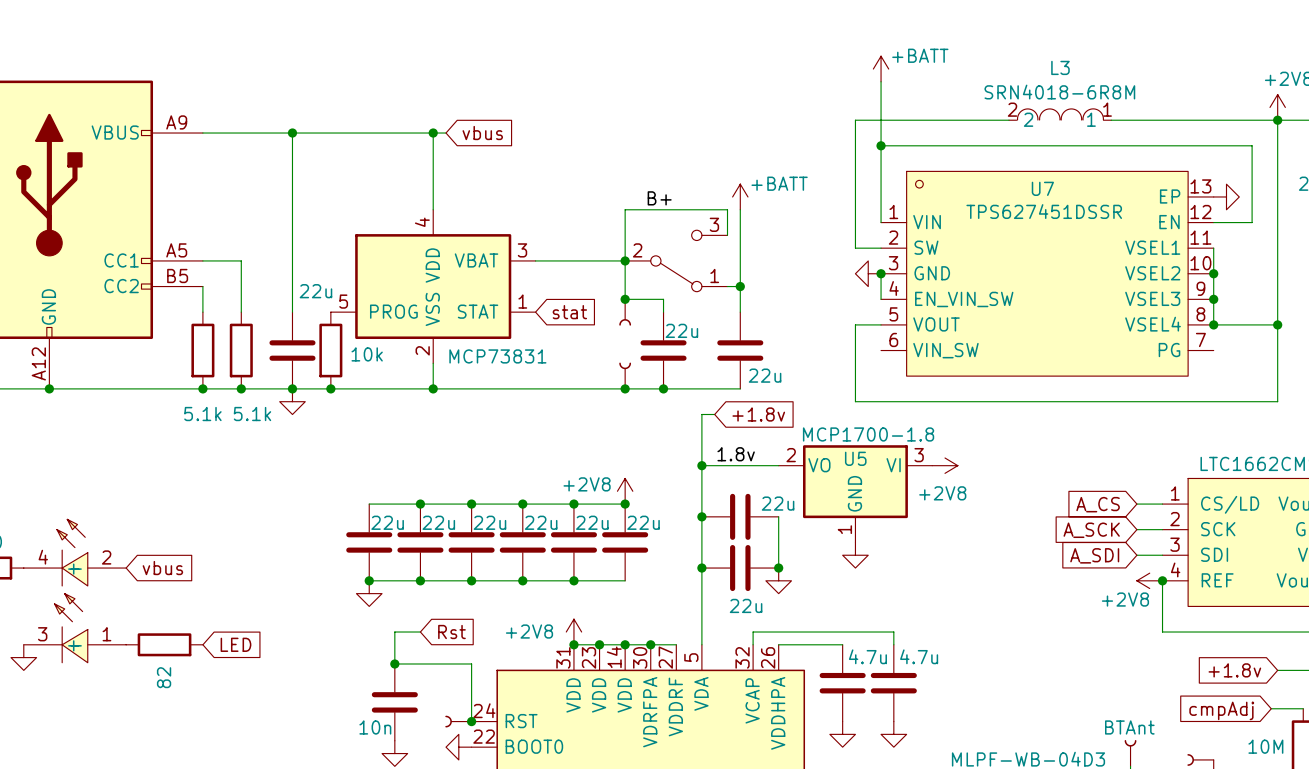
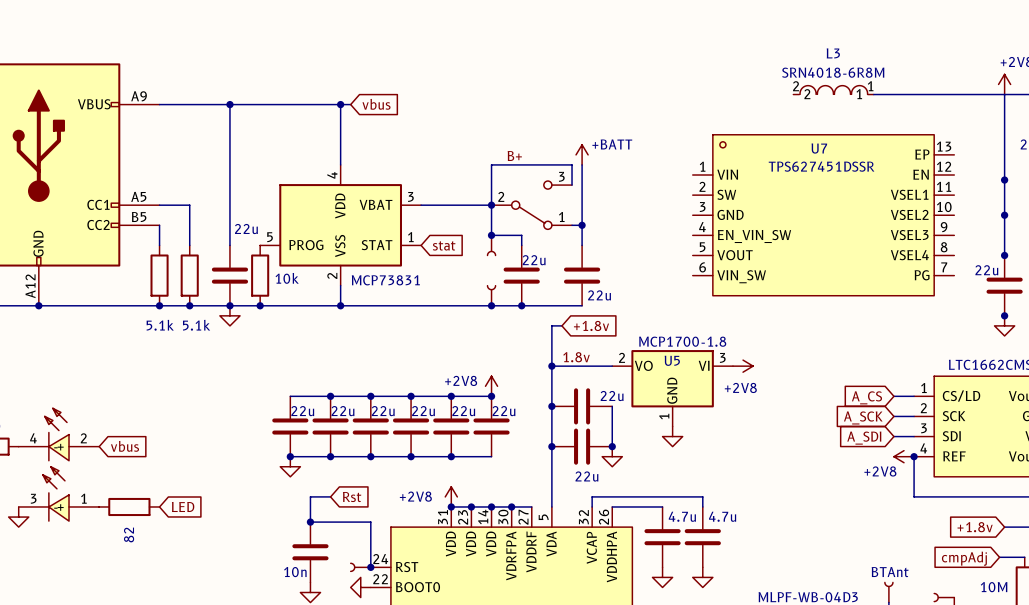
power symbol: +BATT (881, 69) -> none
wire: (881, 81) (881, 222) -> none
wire: (1008, 120) (855, 120) (855, 248) (881, 248) -> none
junction: (1277, 120) -> none
wire: (881, 145) (1252, 145) (1252, 222) (1213, 222) -> none
junction: (881, 145) -> none
power symbol: (1226, 196) -> none
junction: none -> (1004, 180)
wire: (1213, 248) (1213, 324) (1277, 324) (1277, 401) (855, 401) (855, 324) (881, 324) -> none
power symbol: (868, 273) -> none
wire: (881, 273) (881, 299) -> none
junction: (881, 273) -> none
junction: (1213, 273) -> none
junction: none -> (1004, 215)
junction: (1213, 299) -> none
junction: (1213, 324) -> none
part: none -> 22u (1004, 285)
junction: none -> (1004, 315)
power symbol: none -> (1004, 325)

